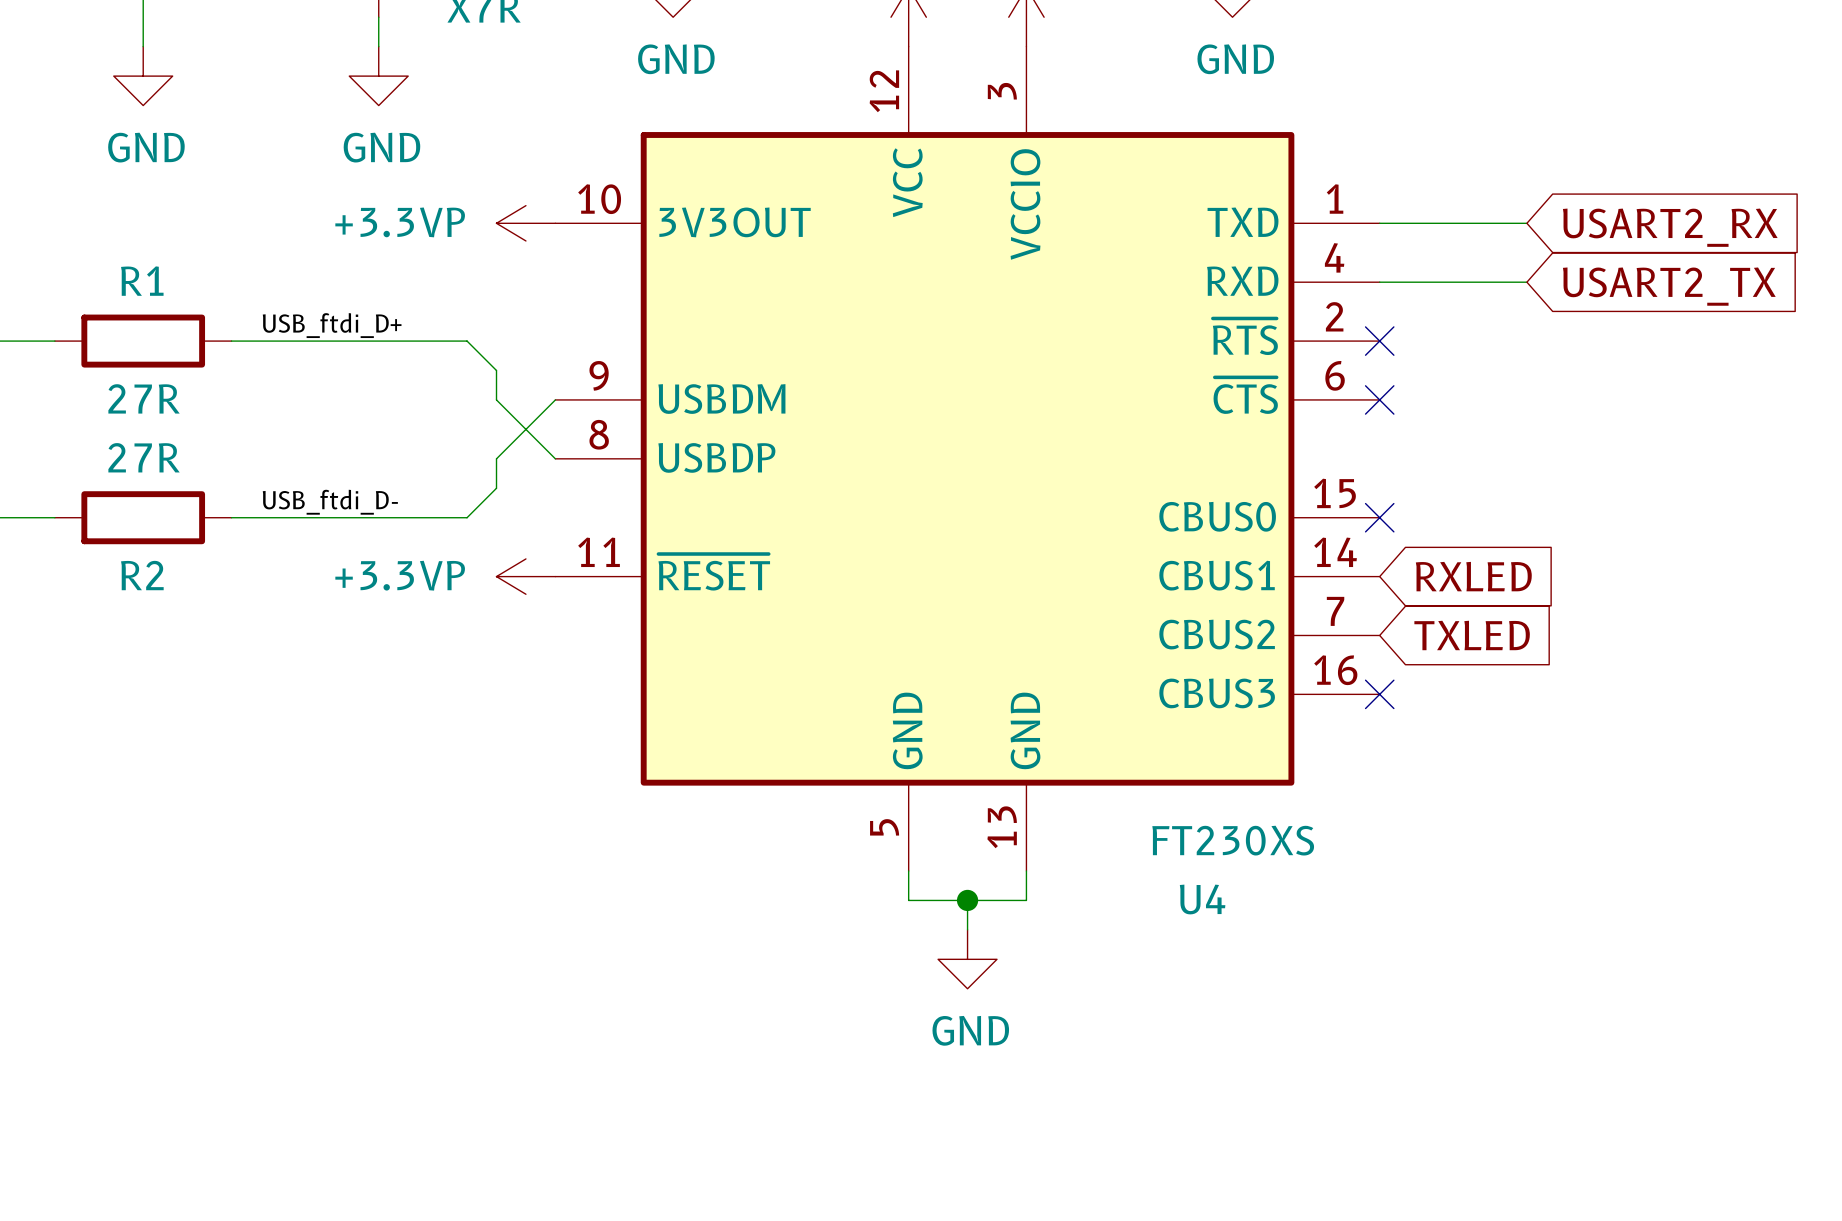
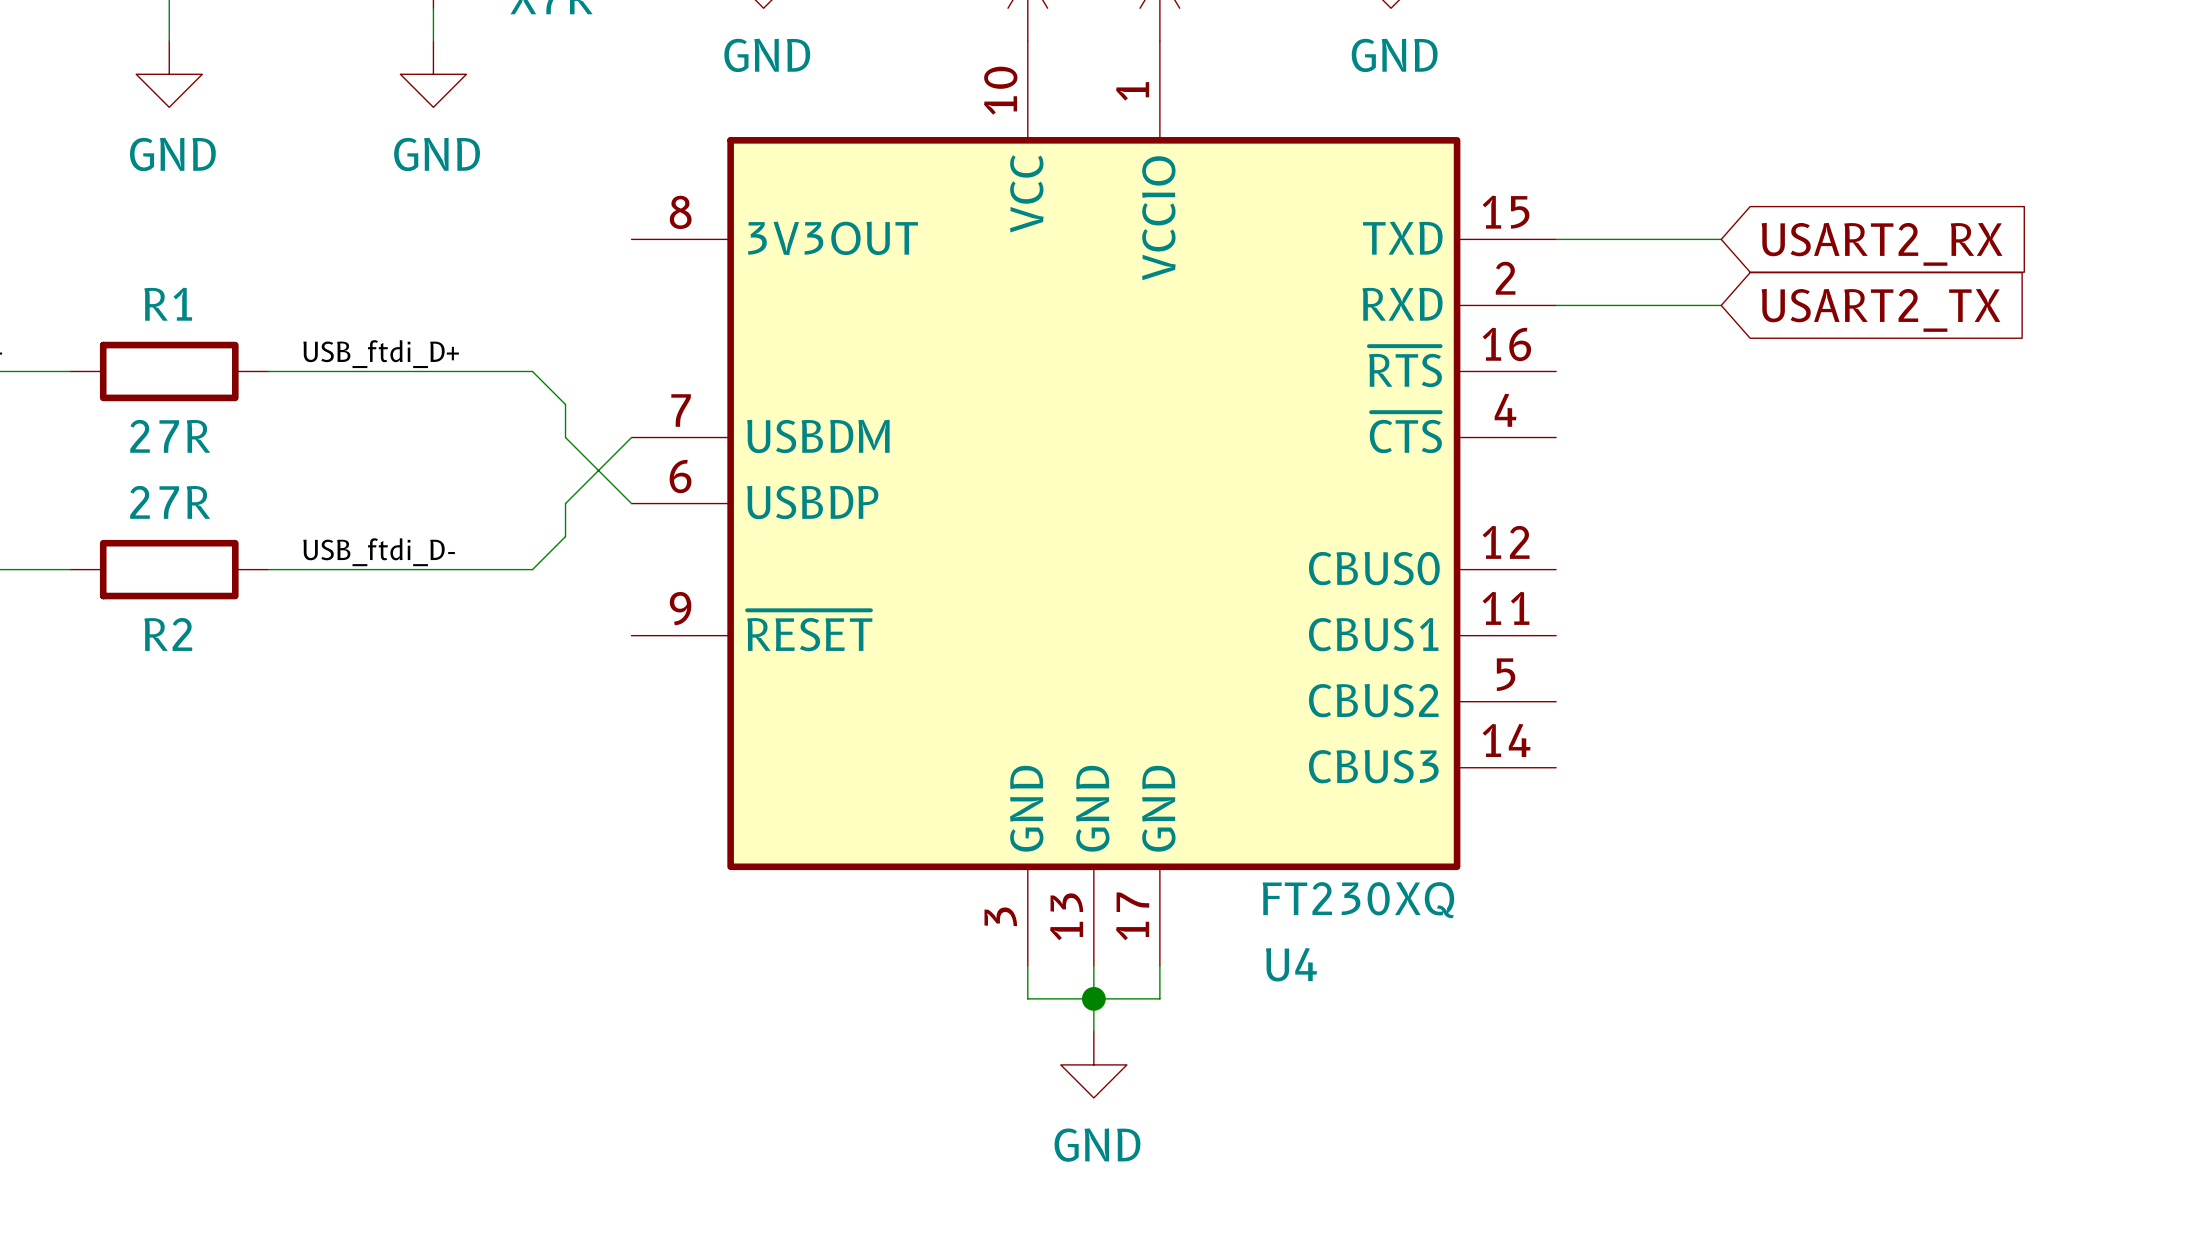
U4 symbol: [555, 46, 1380, 872] -> [631, 41, 1557, 966]
power symbol: +3.3VP (525, 223) -> none
no-connect mark: (1379, 341) -> none
no-connect mark: (1379, 399) -> none
no-connect mark: (1379, 517) -> none
power symbol: +3.3VP (525, 576) -> none
global label: RXLED (1473, 576) -> none
global label: TXLED (1472, 635) -> none
no-connect mark: (1379, 694) -> none
U4 value: FT230XS (1233, 840) -> FT230XQ (1358, 900)
wire: none -> (1093, 965) (1093, 998)
U4 name position: U4 (1202, 899) -> U4 (1291, 964)

